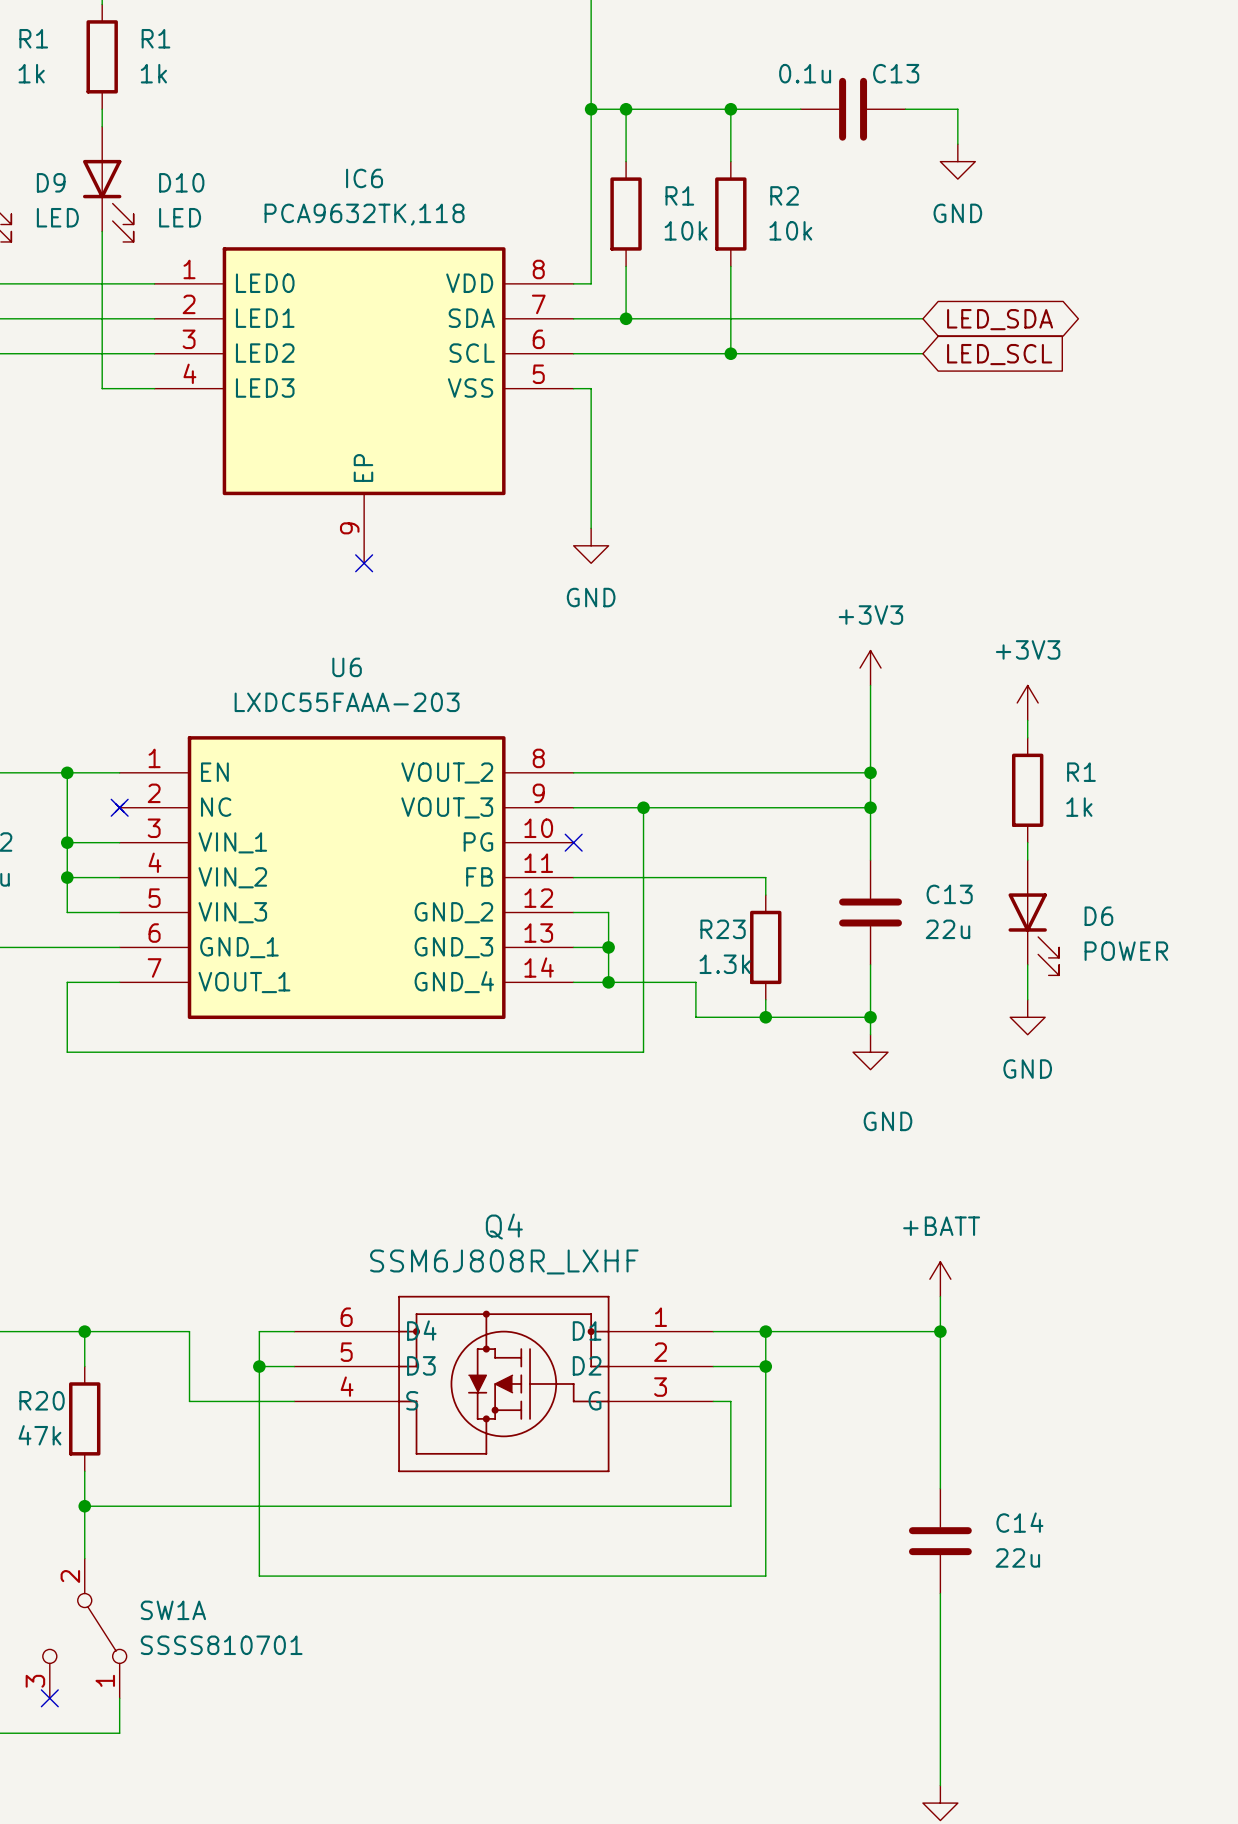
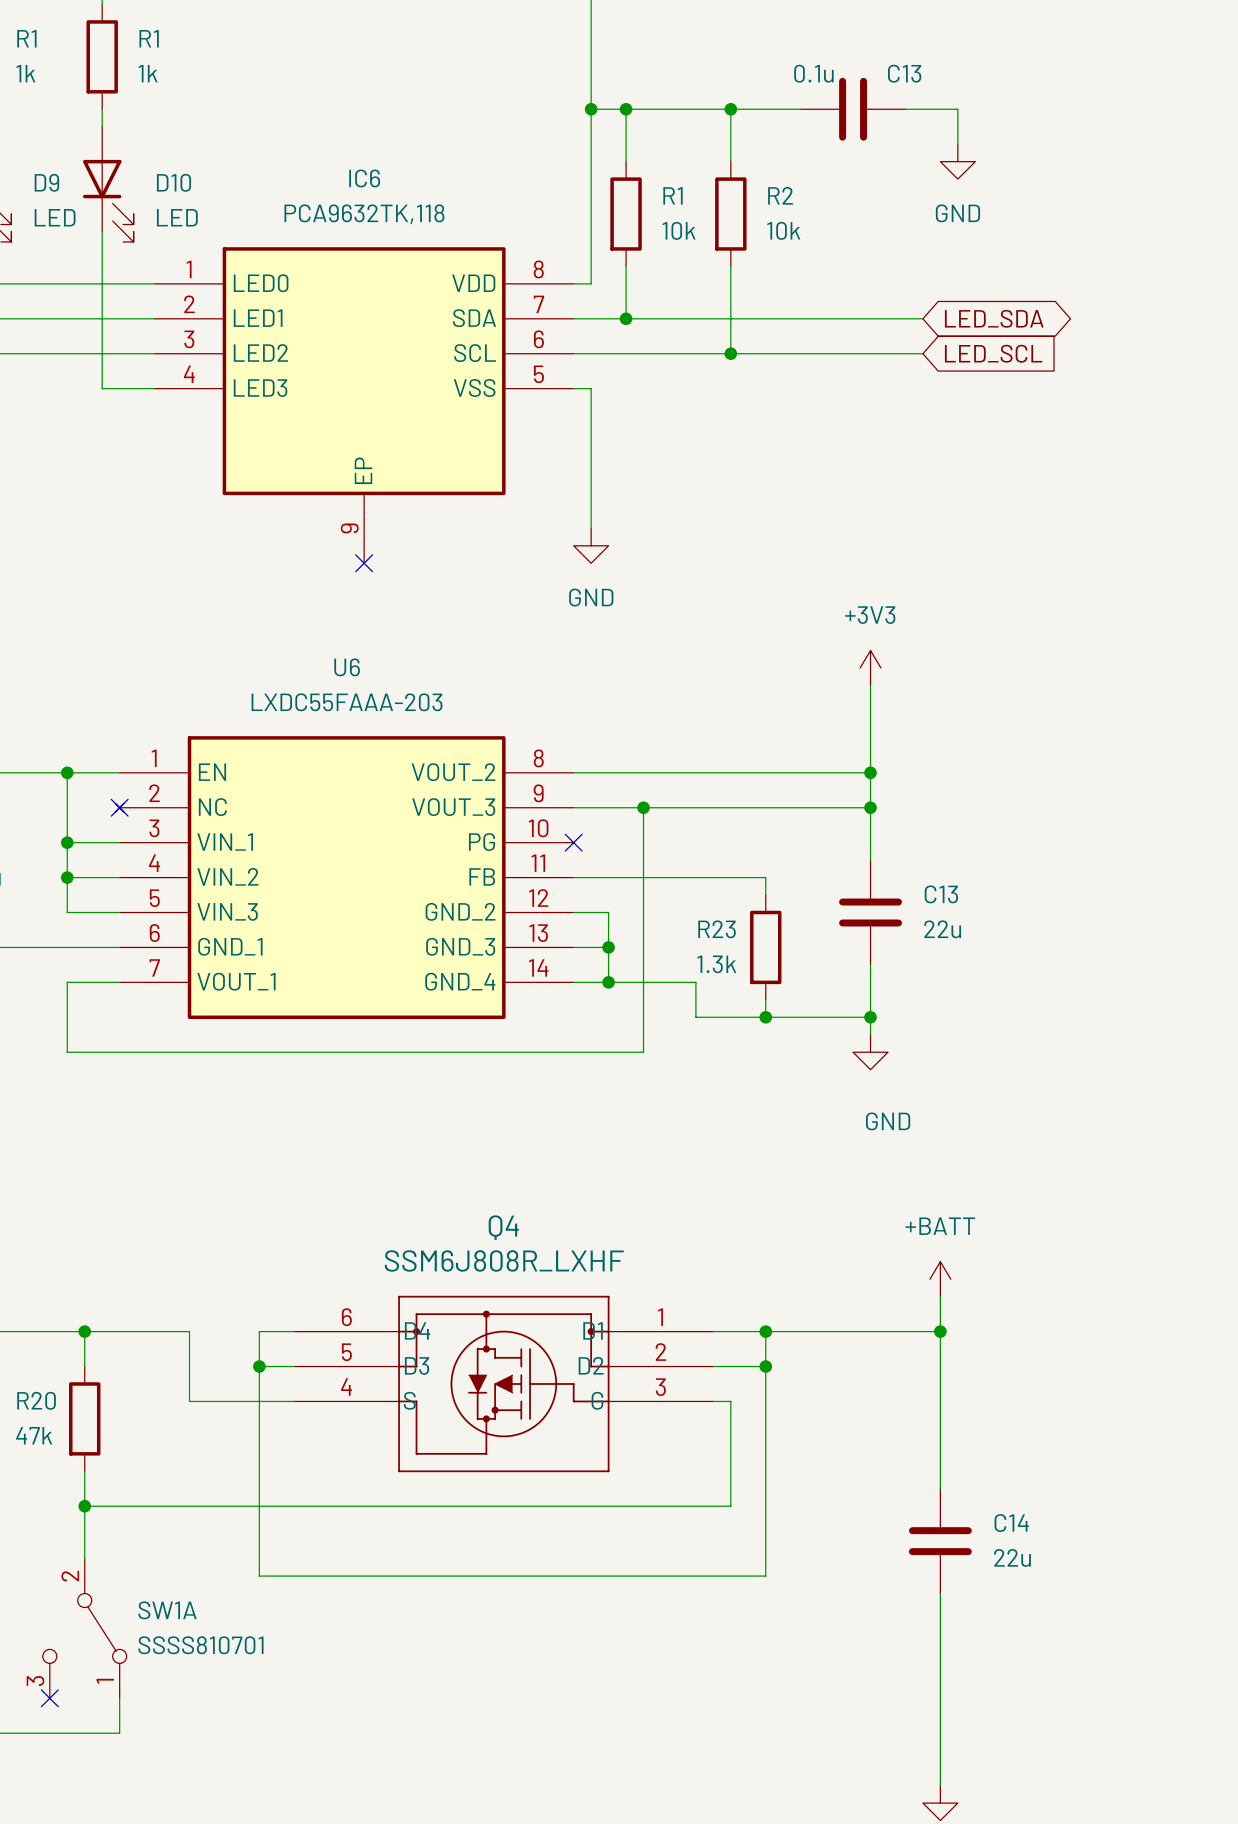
power symbol: +3V3 (1027, 702) -> none
wire: (1027, 720) (1027, 737) -> none
R1: 1k (1027, 790) -> none
wire: (1027, 842) (1027, 860) -> none
D6: POWER (1033, 917) -> none
wire: (1027, 964) (1027, 999) -> none
power symbol: GND (1027, 1017) -> none

